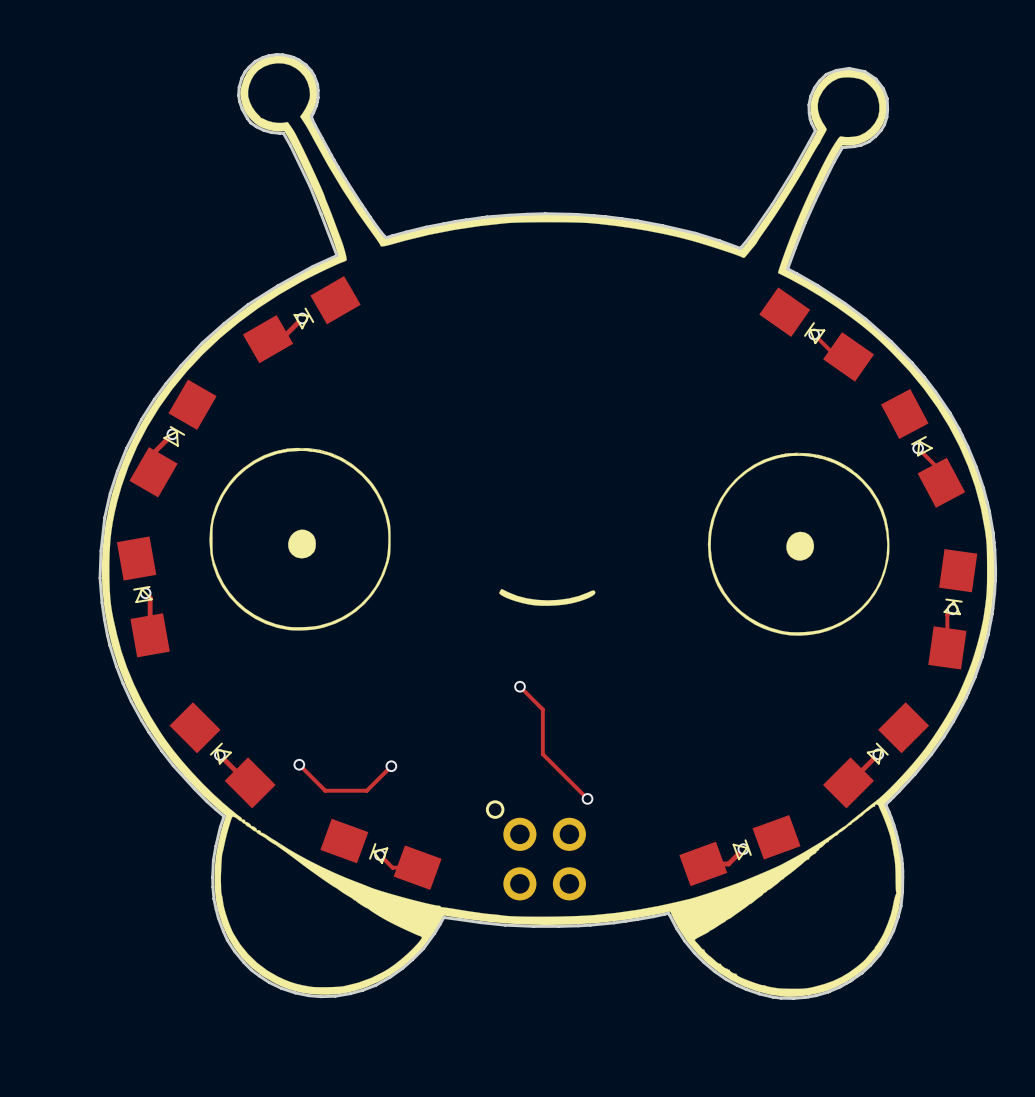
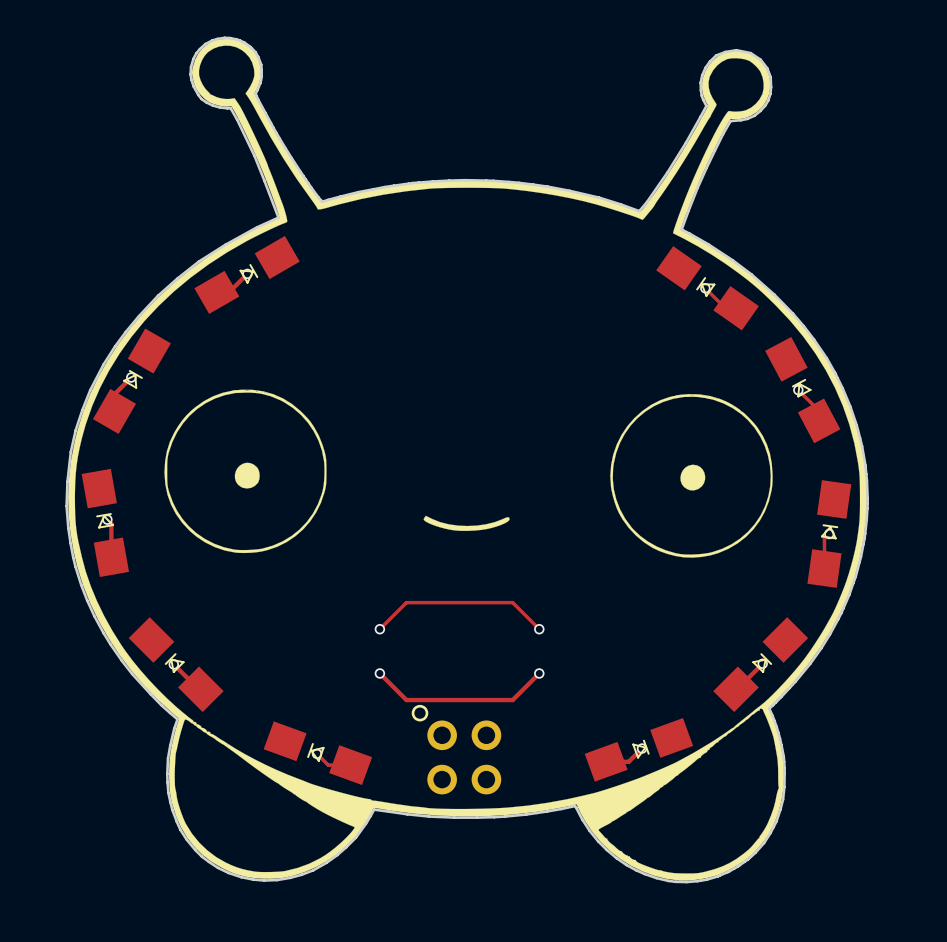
track: (520, 686) (542, 709) (542, 754) (587, 798) -> none
via: (520, 686) -> none
track: none -> (379, 629) (406, 602) (512, 602) (539, 629)
via: none -> (379, 629)
via: none -> (539, 629)
track: (299, 764) (325, 790) (366, 790) (391, 766) -> none
via: (299, 764) -> none
track: none -> (379, 673) (406, 700) (512, 700) (539, 673)
via: none -> (379, 673)
via: none -> (539, 673)
via: (391, 766) -> none
via: (587, 798) -> none

